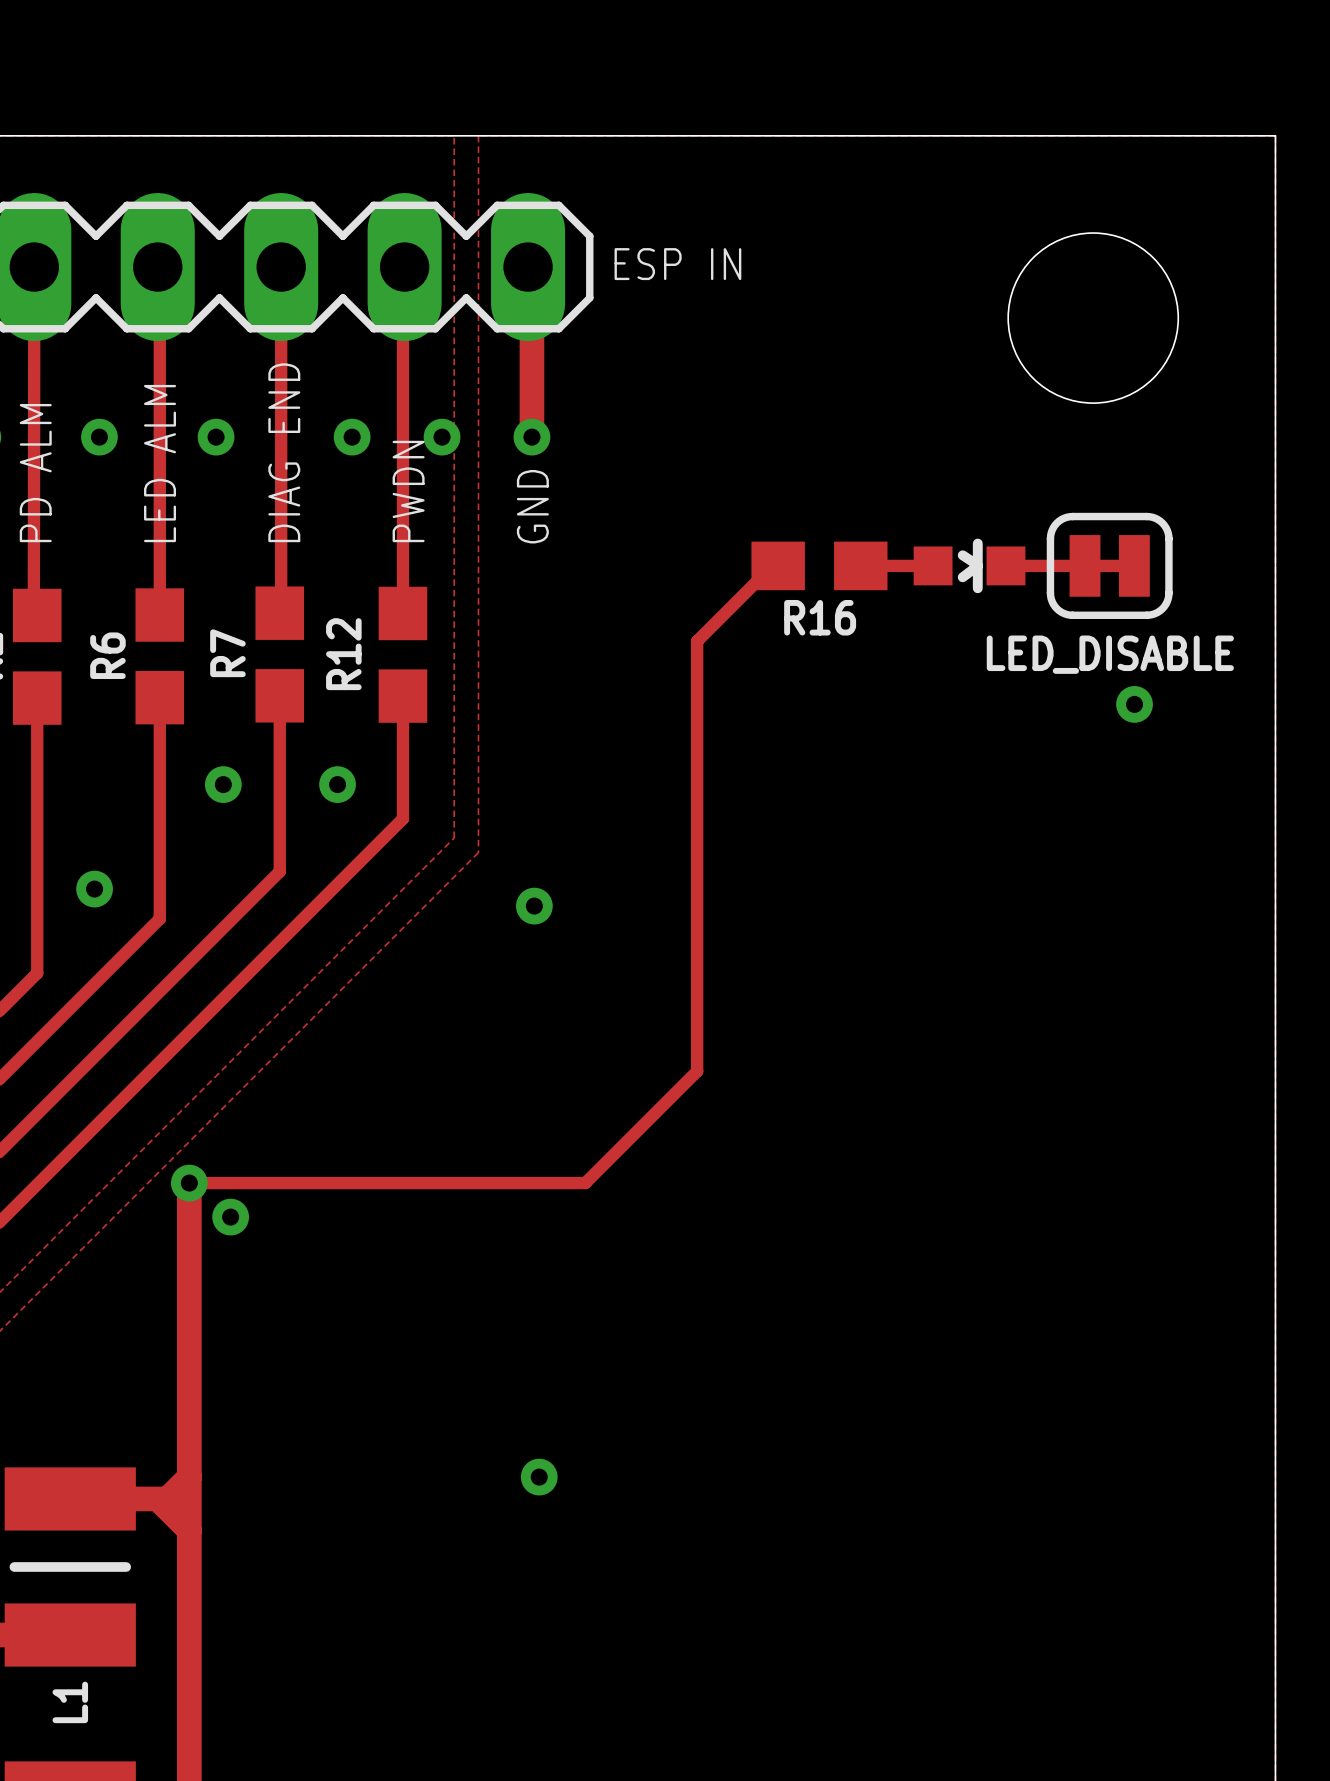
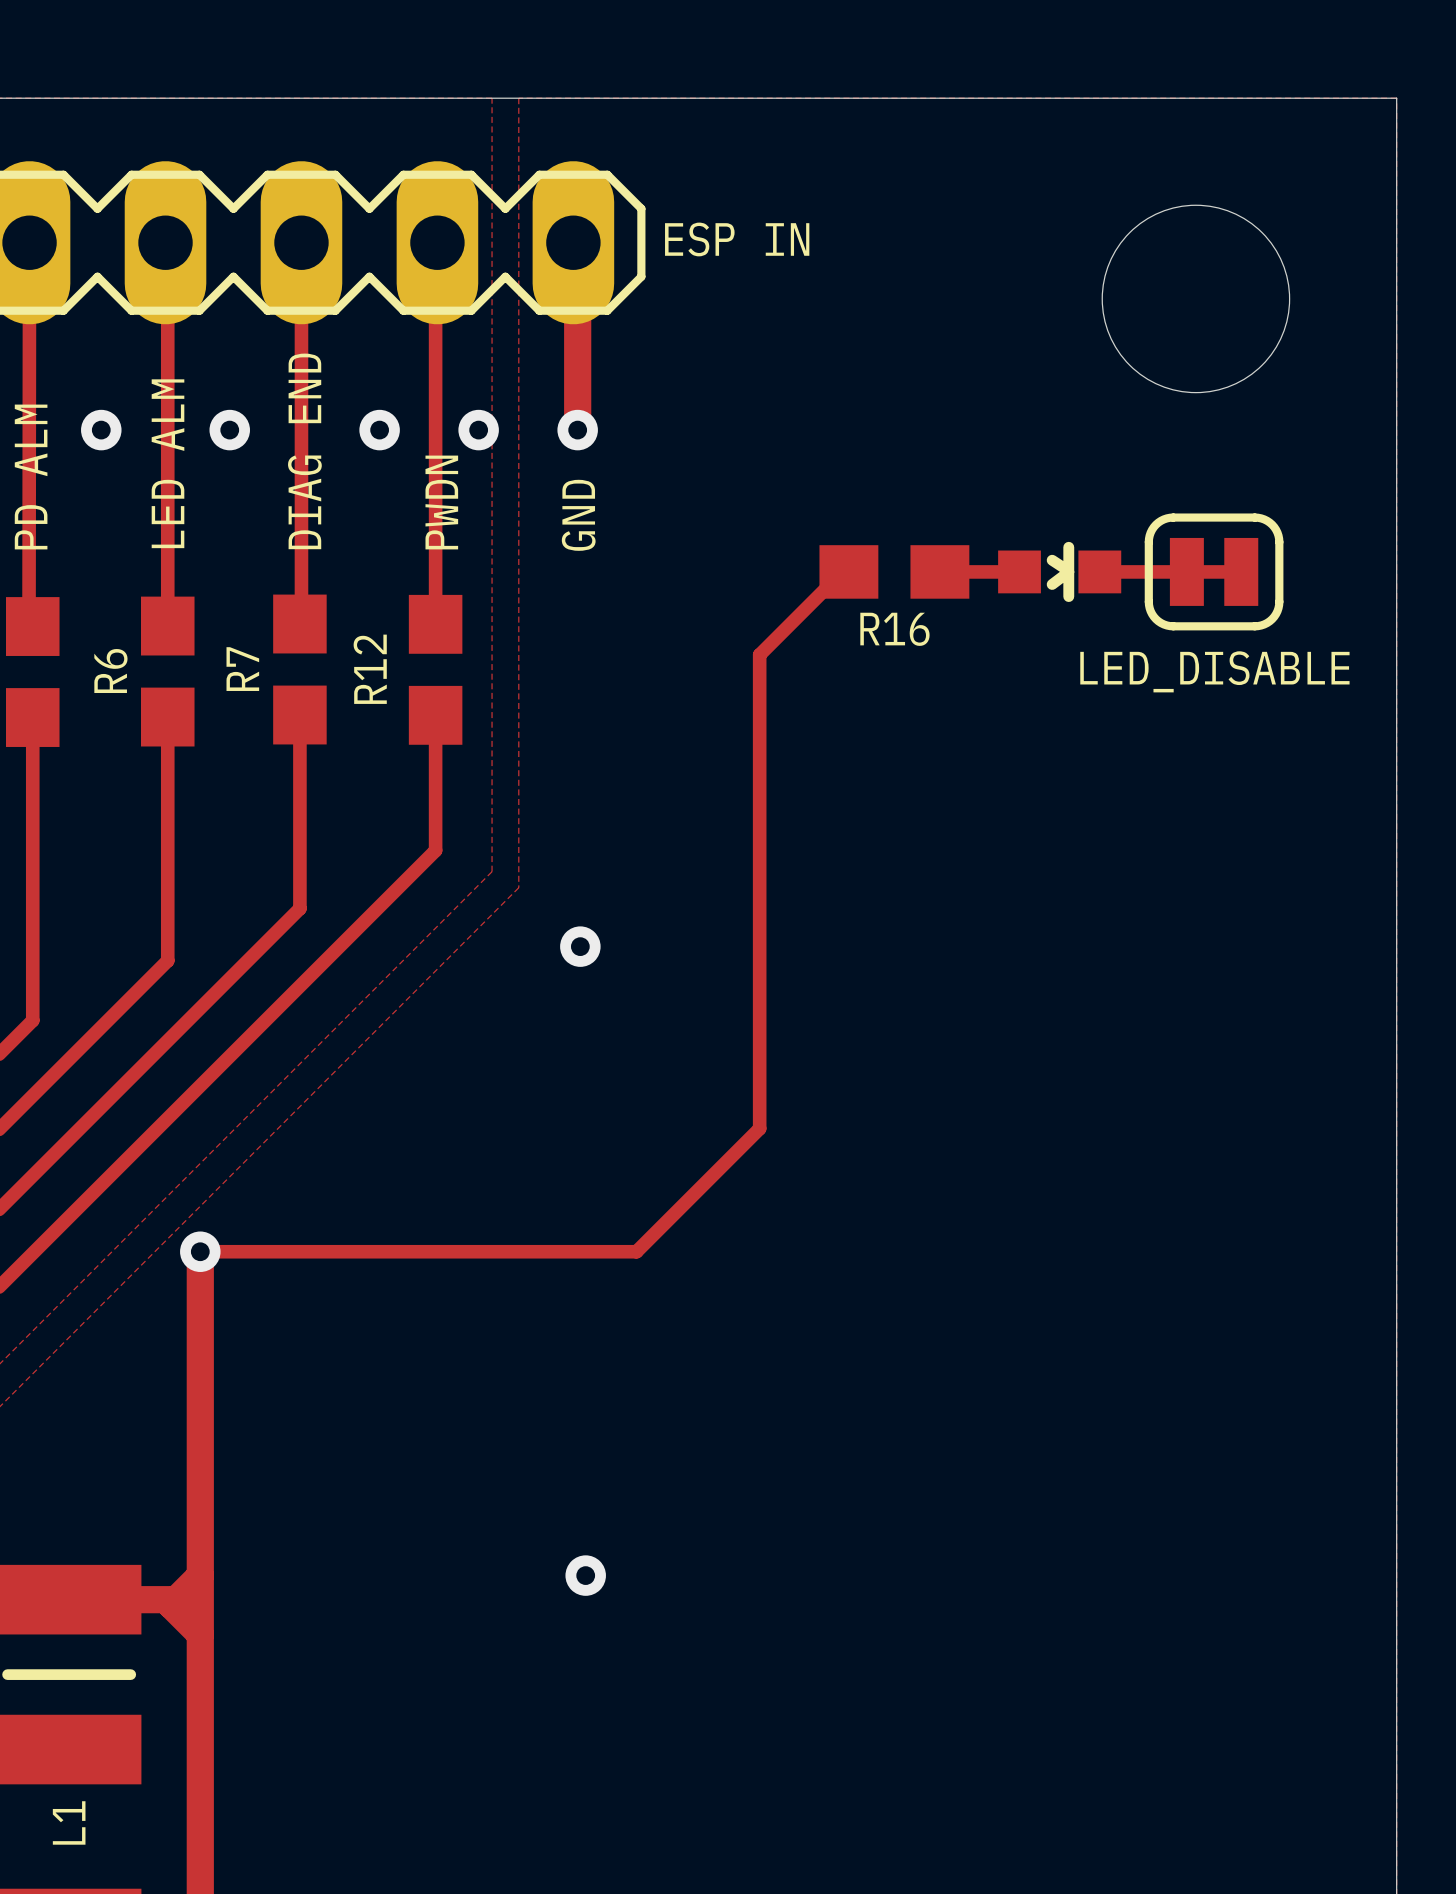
via: (1134, 704) -> none
via: (223, 784) -> none
via: (337, 784) -> none
via: (94, 889) -> none
via: (230, 1217) -> none

